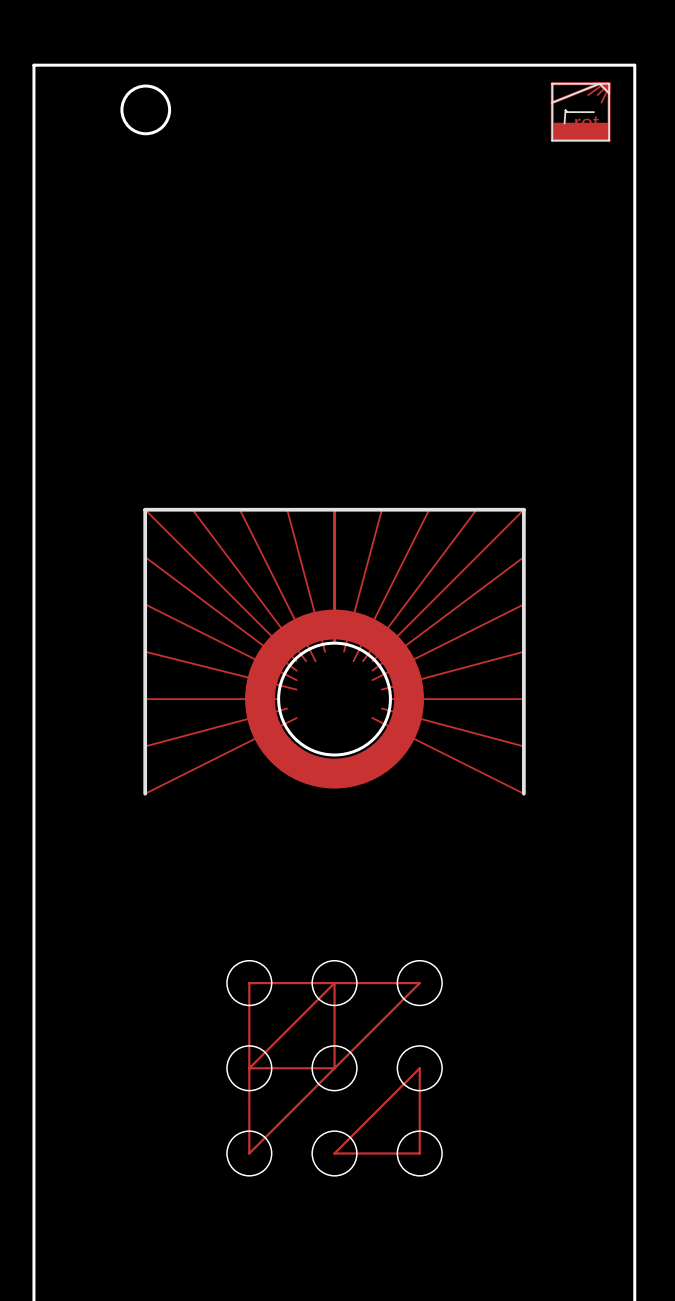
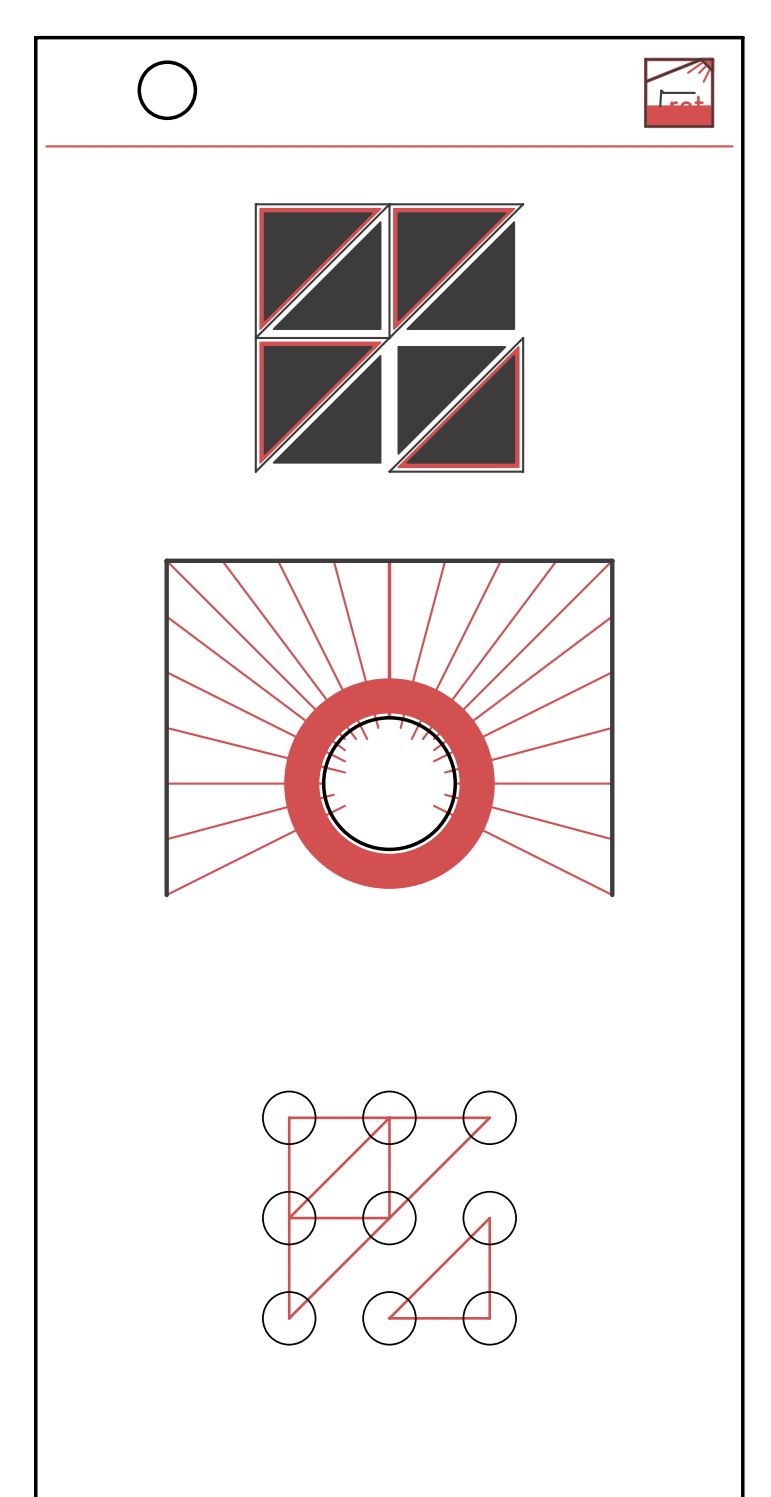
top track: none -> (46, 146) (732, 146)
line: none -> (255, 204) (523, 204) (255, 471) (255, 204)
line: none -> (389, 204) (389, 337) (255, 337) (389, 204)
drawing: none -> [259, 207, 520, 469]
line: none -> (523, 337) (389, 471) (523, 471) (523, 337)

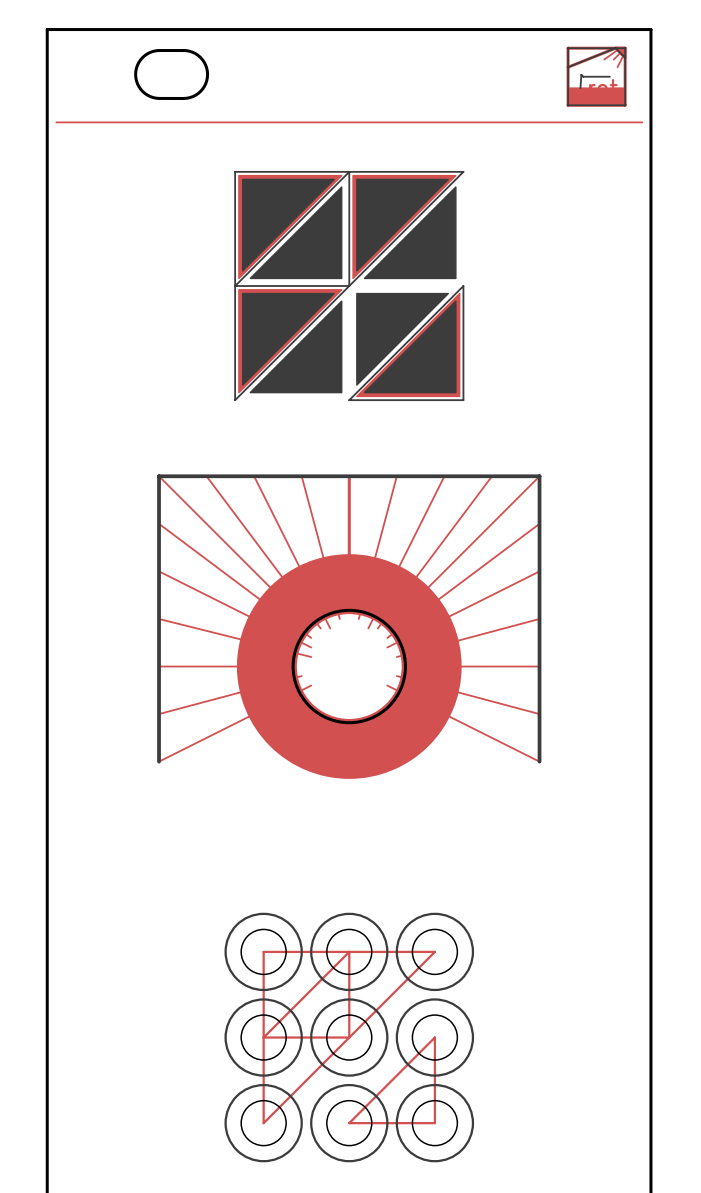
round board edge: [137, 60, 198, 121] -> none
board edge: none -> (159, 50) (186, 50) (200, 57) (205, 65) (207, 74) (205, 83) (200, 91) (192, 96) (183, 98) (156, 98) (142, 91) (136, 80) (137, 65) (147, 53) (159, 50)
drawing shape: [284, 678, 495, 889] -> [236, 554, 462, 779]
drawing: none -> [224, 912, 475, 1163]

